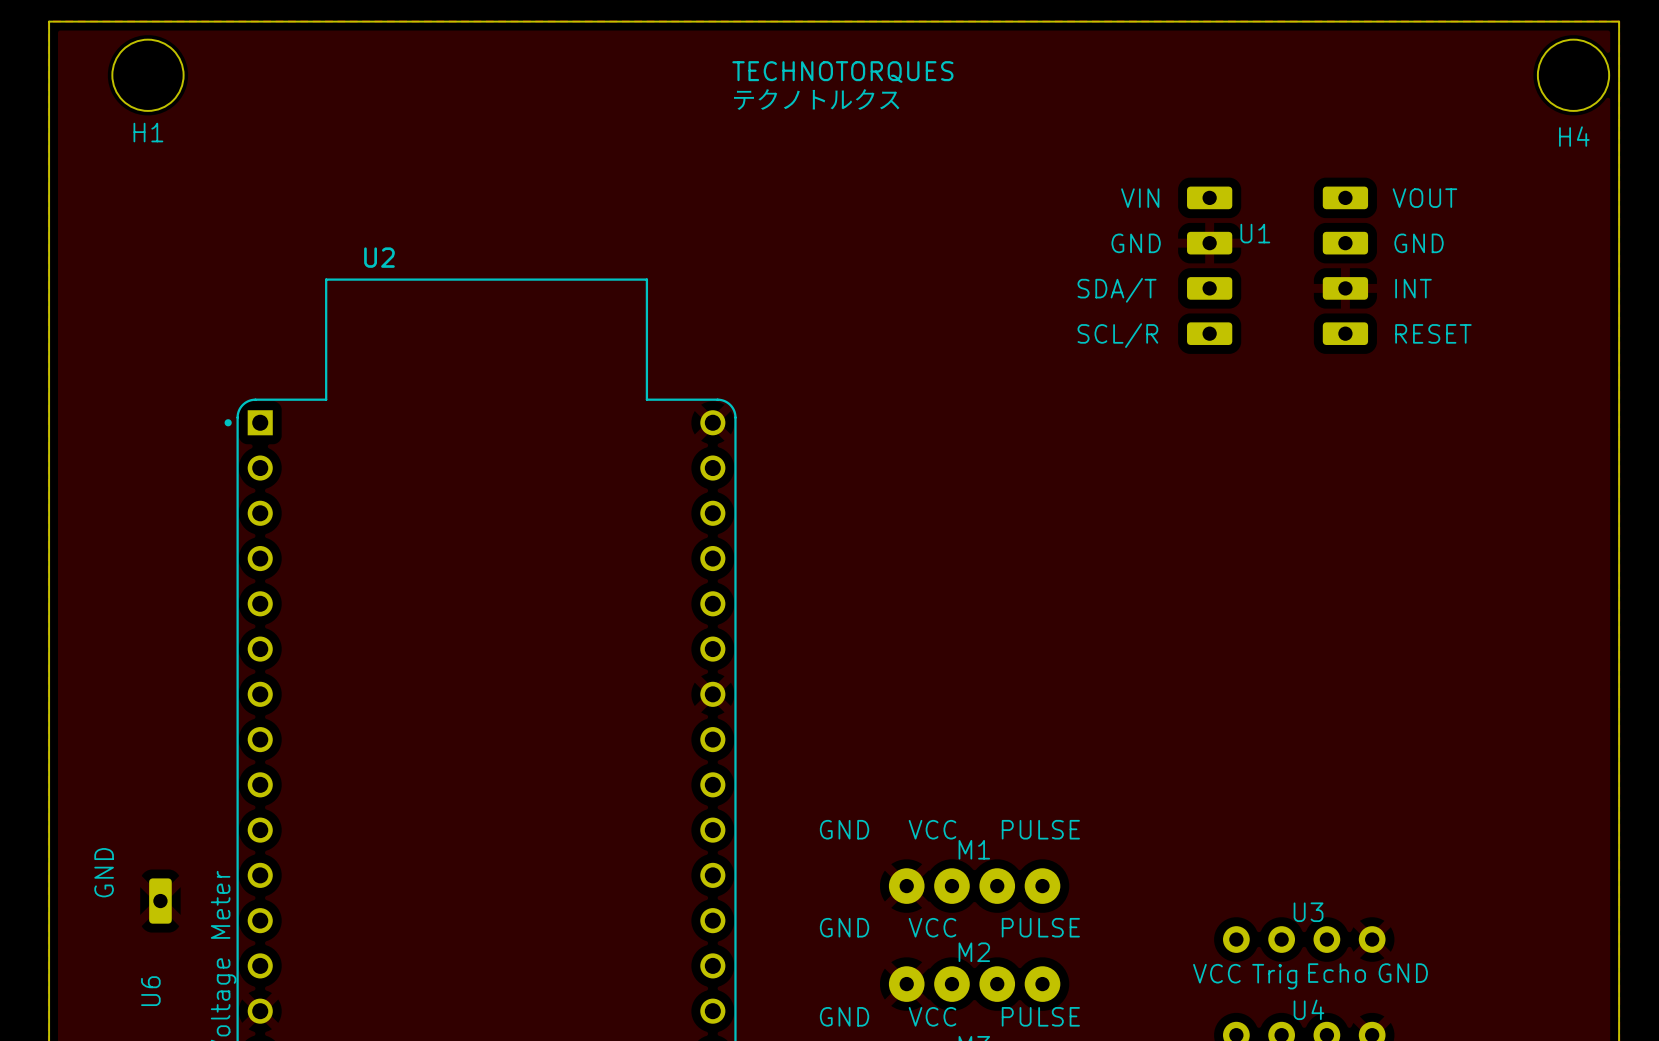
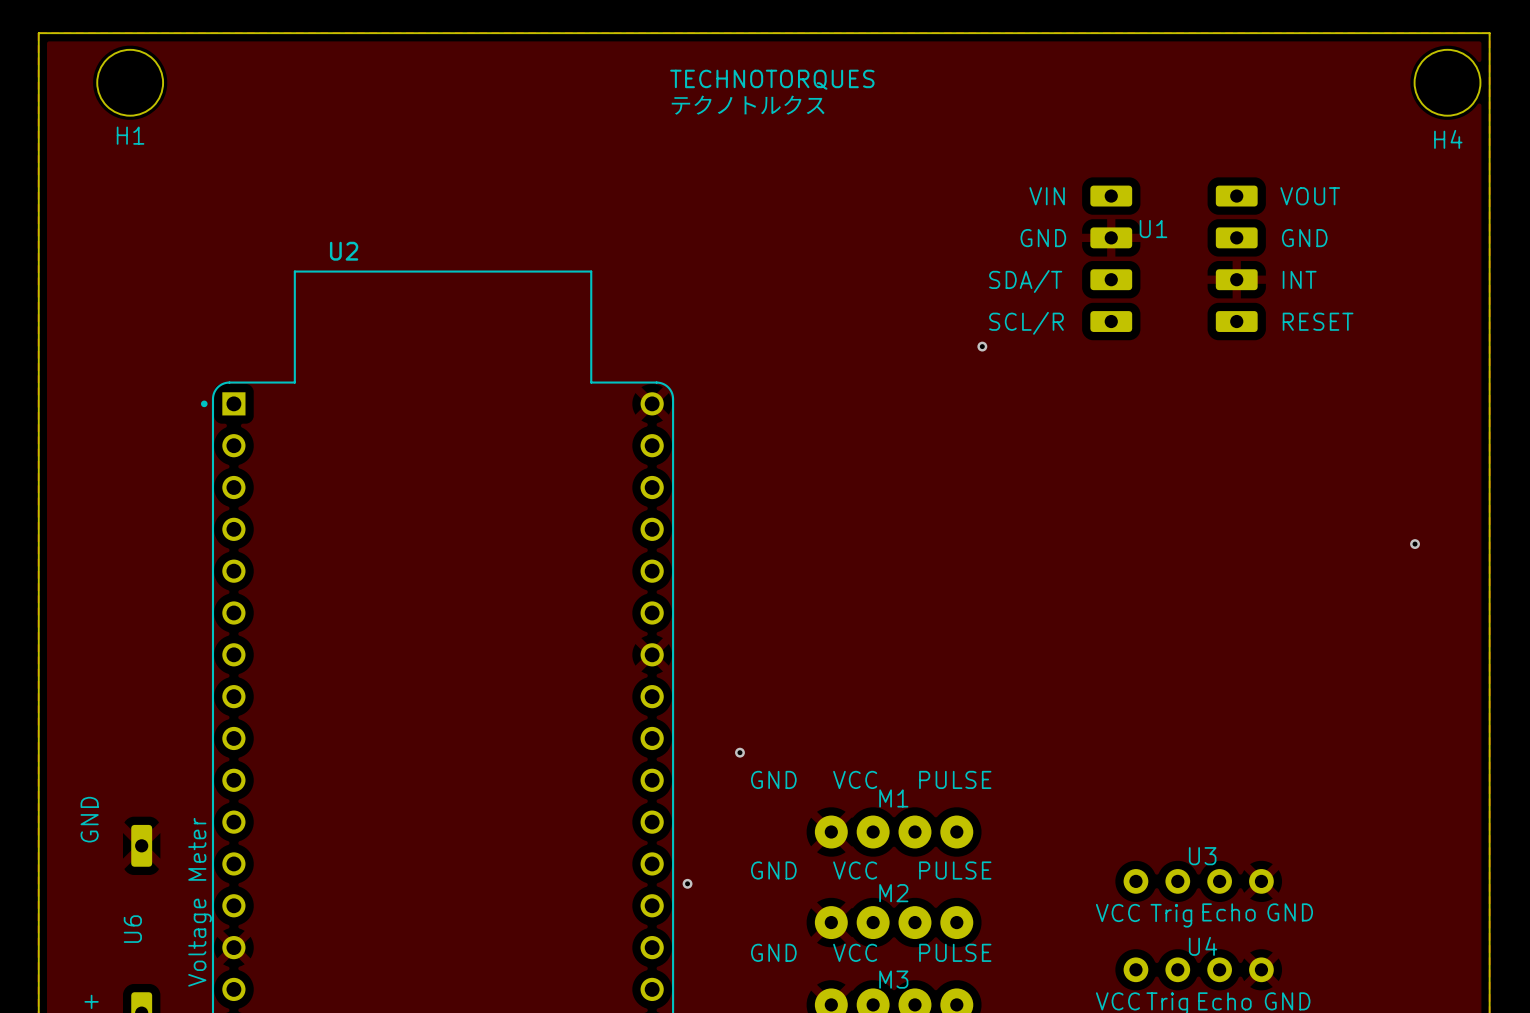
via: none -> (982, 346)
via: none -> (1415, 544)
via: none -> (739, 752)
via: none -> (687, 883)

